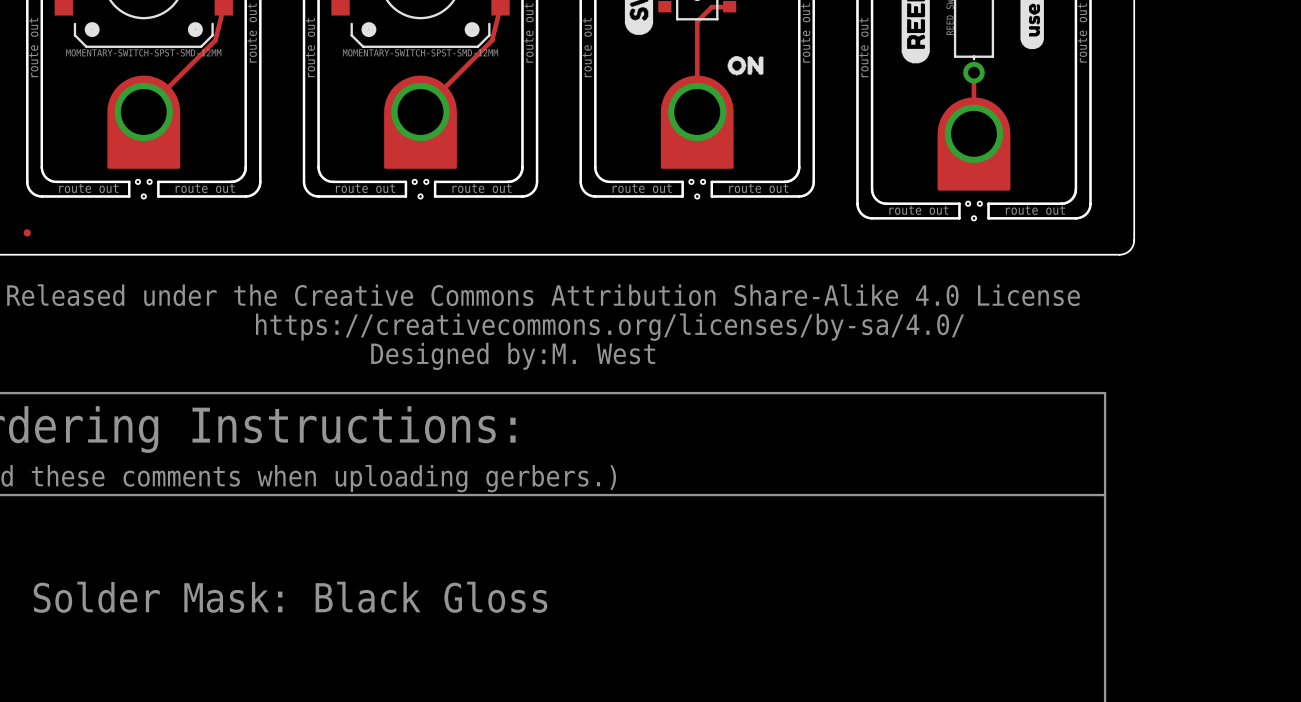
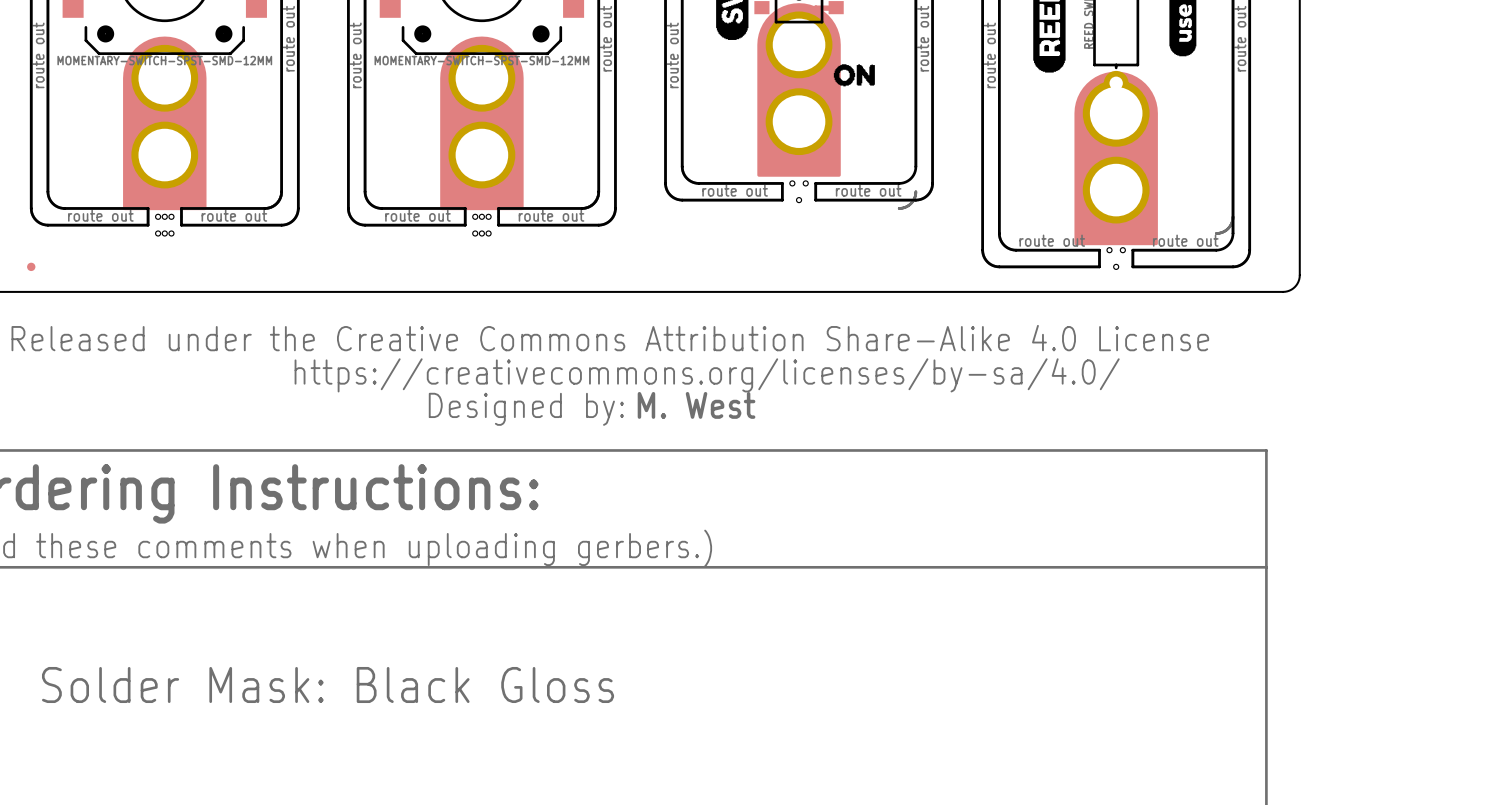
track: (223, 6) (215, 40) (143, 111) -> none
track: (500, 6) (492, 40) (420, 111) -> none
part: none -> (799, 89)
part footprint: [937, 97, 1011, 191] -> [1074, 71, 1158, 246]
part: none -> (164, 123)
part: none -> (481, 123)
part: (143, 122) -> none
part: (420, 122) -> none
part: (697, 122) -> none
board edge: (595, 145) (595, 171) (602, 179) (609, 181) (682, 181) (682, 196) (589, 195) (581, 185) (580, 160) -> (682, 166) (685, 176) (696, 183) (782, 183) (782, 200) (680, 199) (668, 193) (665, 183)
board edge: (799, 145) (798, 171) (791, 179) (784, 181) (711, 181) (711, 196) (804, 195) (813, 185) (813, 160) -> (915, 166) (912, 176) (901, 183) (815, 183) (815, 200) (918, 199) (929, 193) (932, 183)
hole: none -> (792, 183)
hole: none -> (805, 183)
hole: none -> (799, 200)
hole: (137, 181) -> none
hole: (149, 181) -> none
hole: (414, 181) -> none
hole: (426, 181) -> none
hole: (691, 181) -> none
hole: (703, 181) -> none
text position: route out (642, 188) -> route out (735, 190)
text position: route out (758, 188) -> route out (868, 190)
hole: none -> (158, 216)
hole: none -> (164, 216)
hole: none -> (171, 216)
hole: none -> (475, 216)
hole: none -> (481, 216)
hole: none -> (488, 216)
board edge: (872, 189) (875, 198) (884, 203) (959, 203) (959, 218) -> (982, 233) (983, 256) (989, 263) (997, 266) (1099, 266) (1099, 250)
board edge: (1075, 189) (1072, 198) (1063, 203) (988, 203) (988, 218) -> (1249, 233) (1248, 256) (1243, 263) (1235, 266) (1132, 266) (1132, 250)
hole: (143, 196) -> none
hole: (420, 196) -> none
hole: (697, 196) -> none
hole: none -> (158, 233)
hole: none -> (164, 233)
hole: none -> (171, 233)
hole: none -> (475, 233)
hole: none -> (481, 233)
hole: none -> (488, 233)
board edge: (857, 203) (859, 211) (864, 216) (886, 218) -> (999, 216) (999, 235) (1001, 241) (1007, 247) (1016, 250)
hole: (968, 203) -> none
hole: (979, 203) -> none
board edge: (1090, 203) (1088, 211) (1083, 216) (1061, 218) -> (1233, 216) (1232, 235) (1230, 241) (1224, 247) (1216, 250)
hole: none -> (1109, 250)
hole: (973, 218) -> none
hole: none -> (1122, 250)
hole: none -> (1116, 266)

